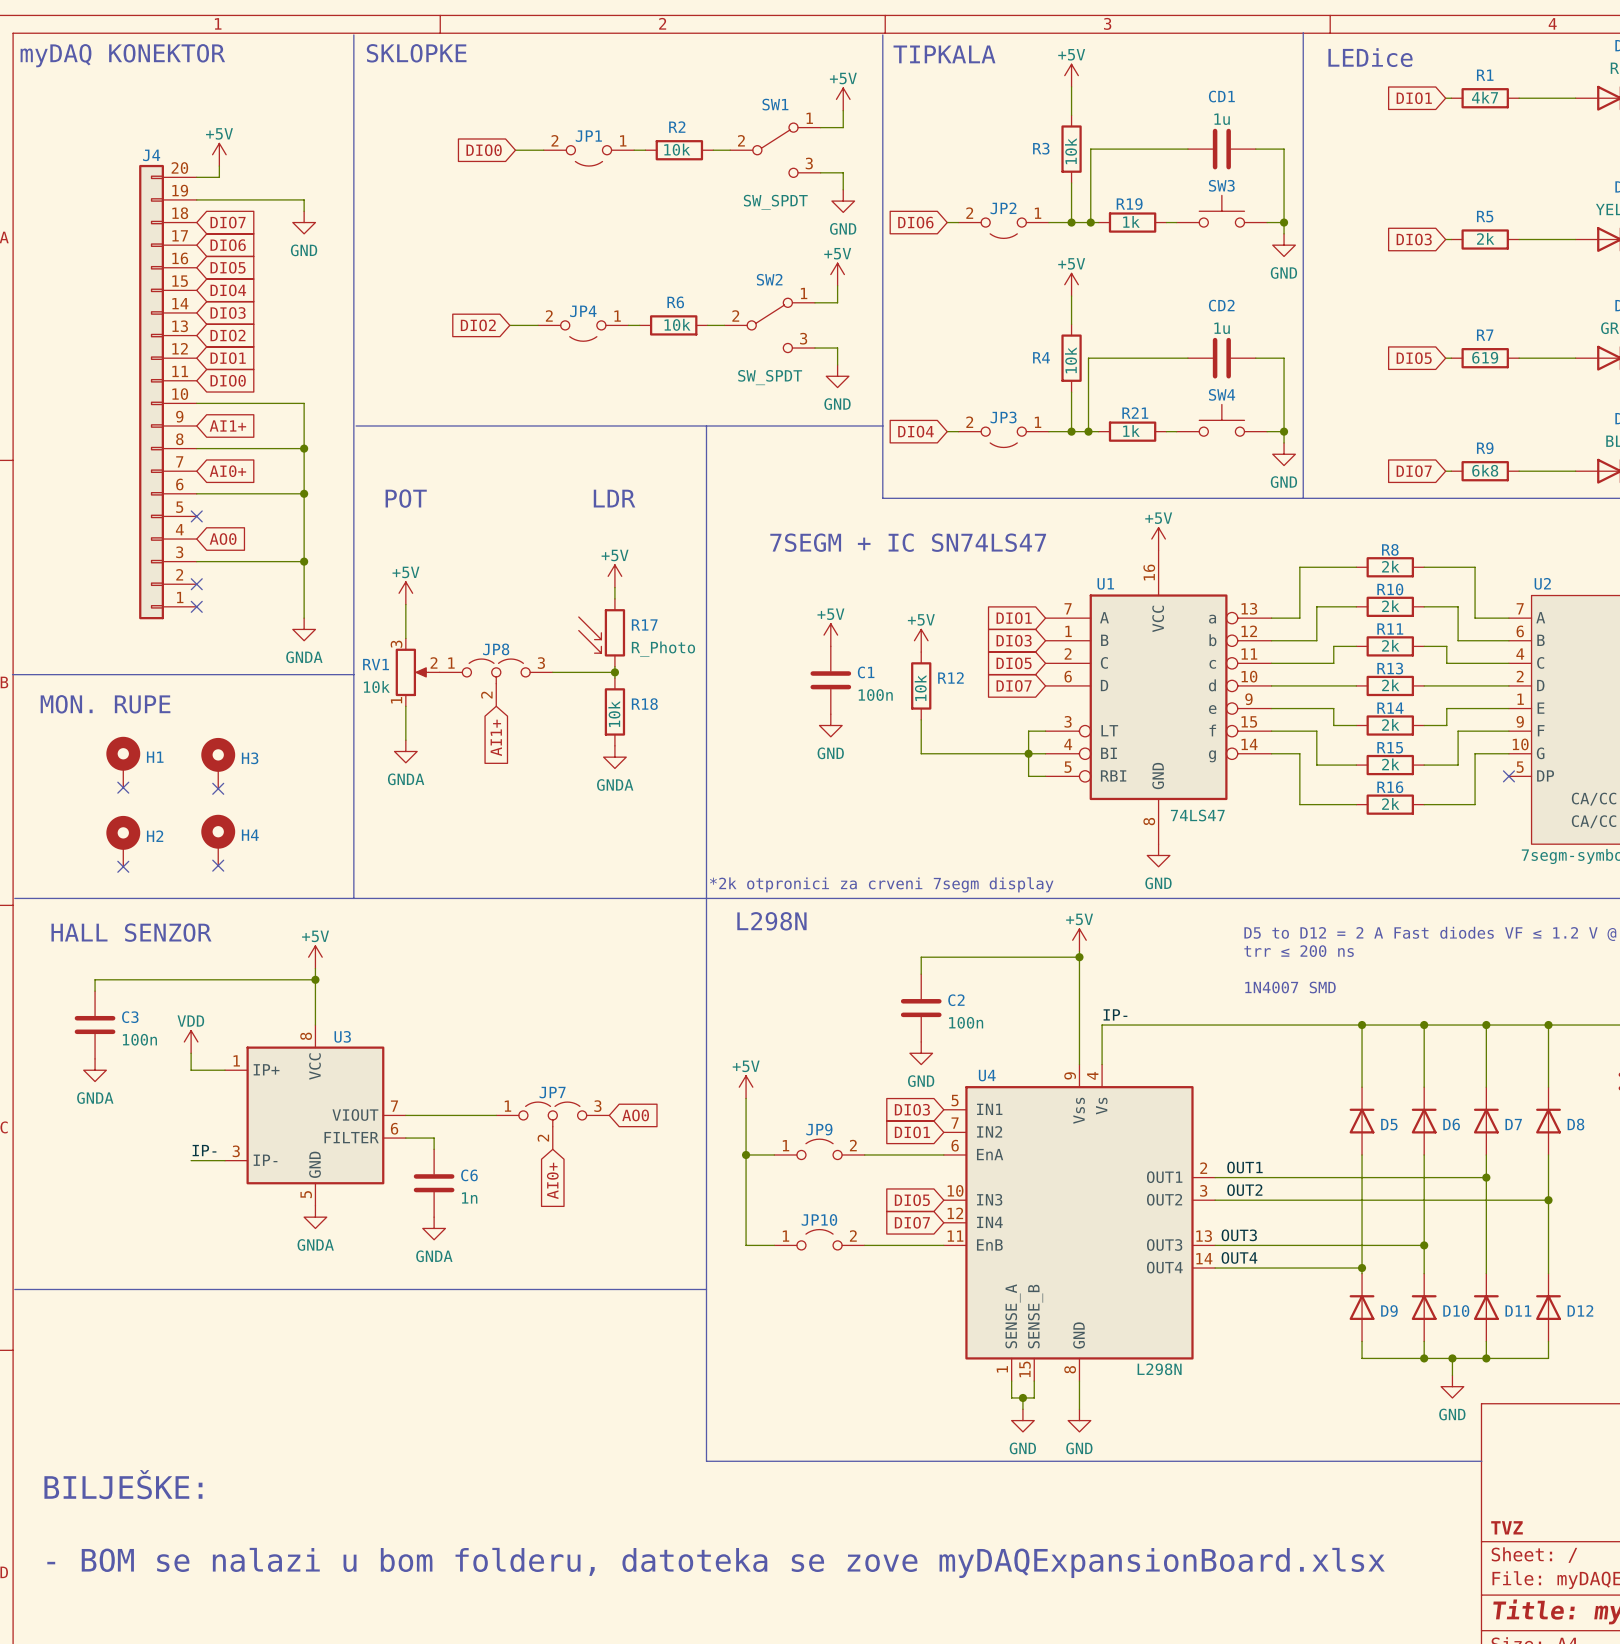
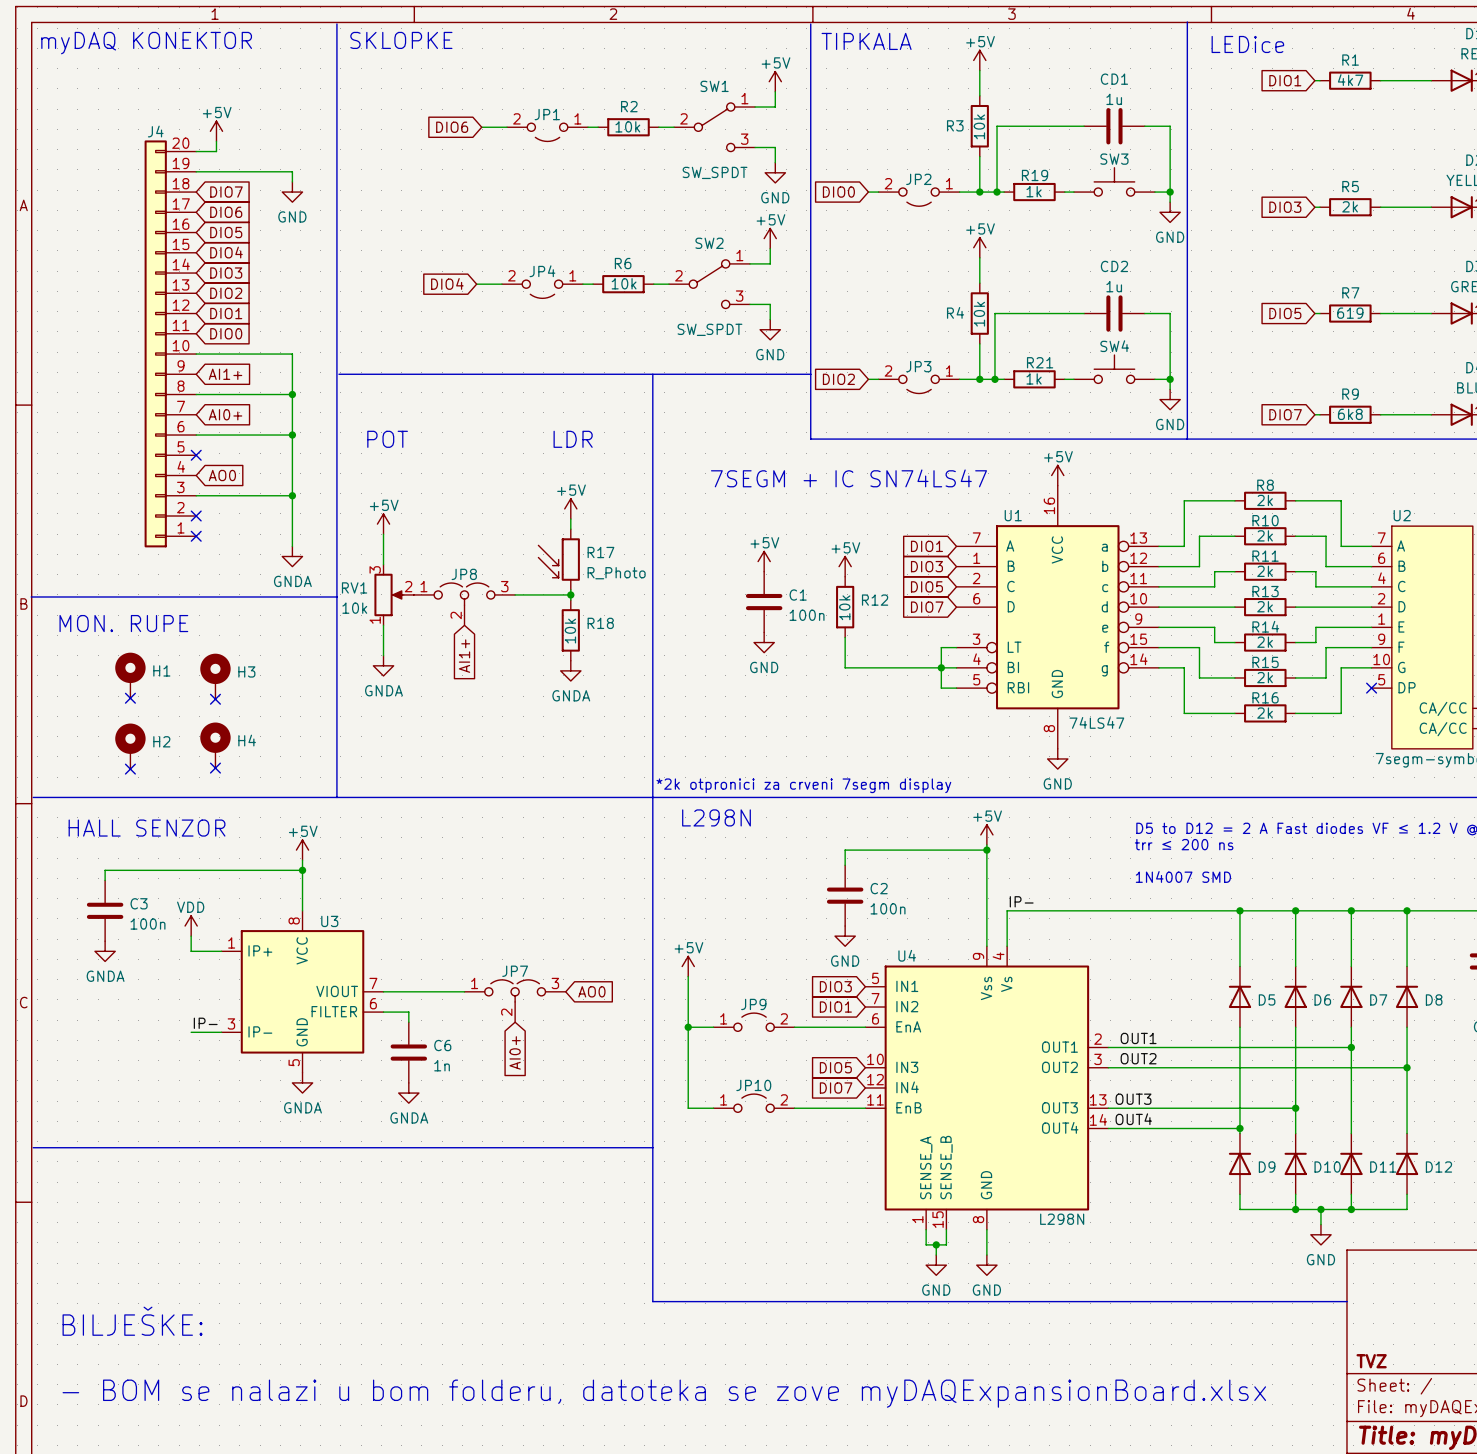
global label: DIO0 (484, 150) -> DIO6 (452, 127)
global label: DIO6 (915, 222) -> DIO0 (838, 192)
global label: DIO2 (478, 325) -> DIO4 (447, 283)
global label: DIO4 (915, 431) -> DIO2 (838, 379)

